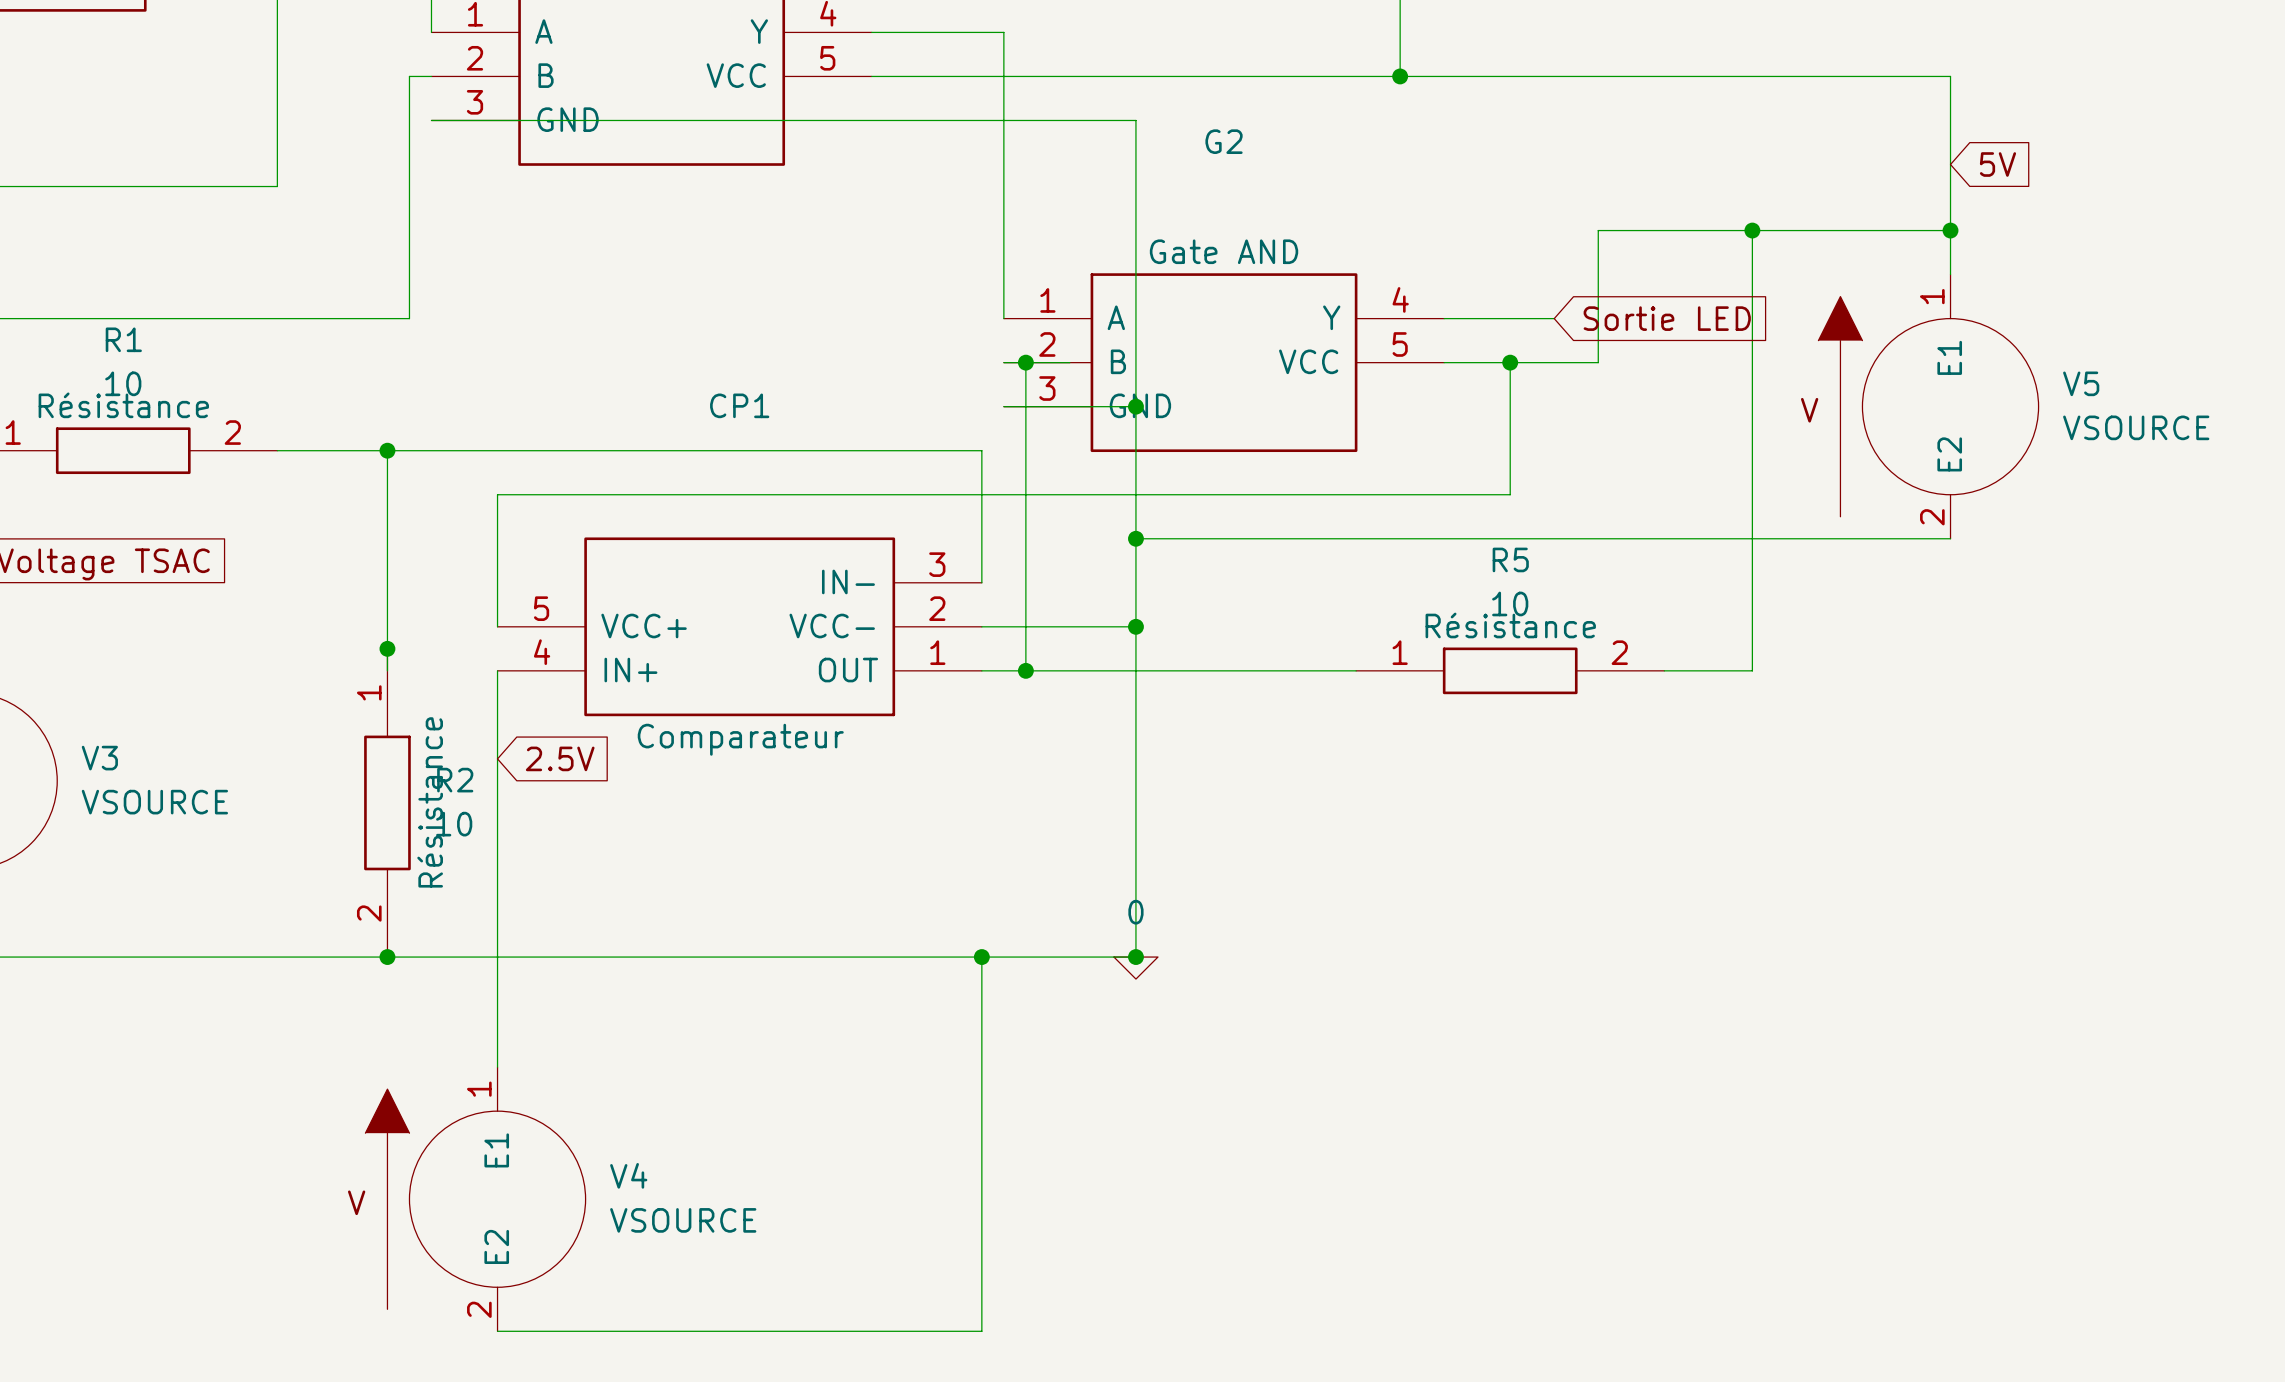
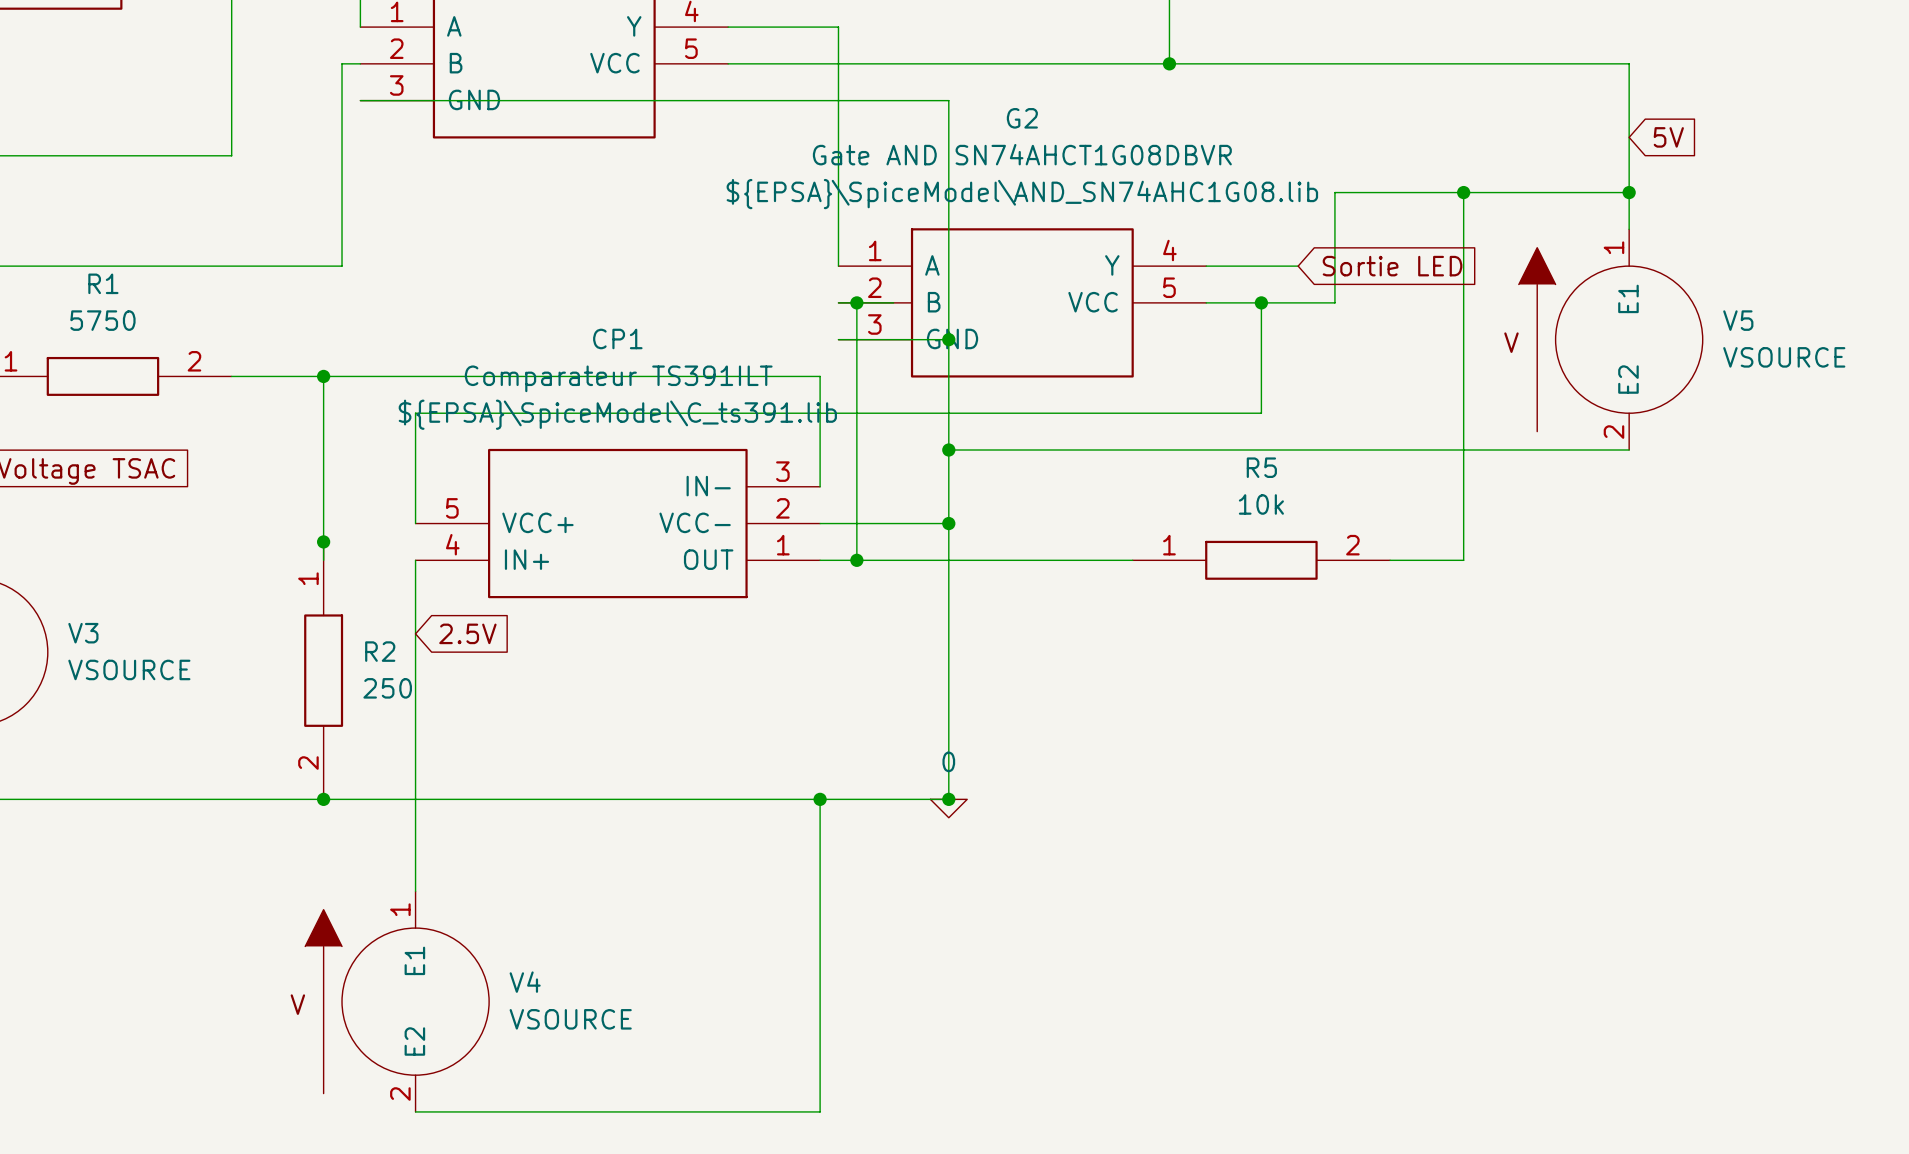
G2 value: none -> Gate AND SN74AHCT1G08DBVR (1022, 154)
G2 text: none -> ${EPSA}\SpiceModel\AND_SN74AHC1G08.lib (1022, 194)
G2 text: Gate AND (1224, 251) -> none
R1 text: 10 (123, 383) -> 5750 (102, 320)
R1 text: Résistance (123, 405) -> none
CP1 value: none -> Comparateur TS391ILT (618, 378)
CP1 text: none -> ${EPSA}\SpiceModel\C_ts391.lib (617, 414)
R5 text: 10 (1510, 603) -> 10k (1261, 504)
R5 text: Résistance (1510, 625) -> none
CP1 text: Comparateur (740, 739) -> none
R2 text: Résistance (430, 802) -> none
R2 text: 10 (454, 824) -> 250 (387, 688)

